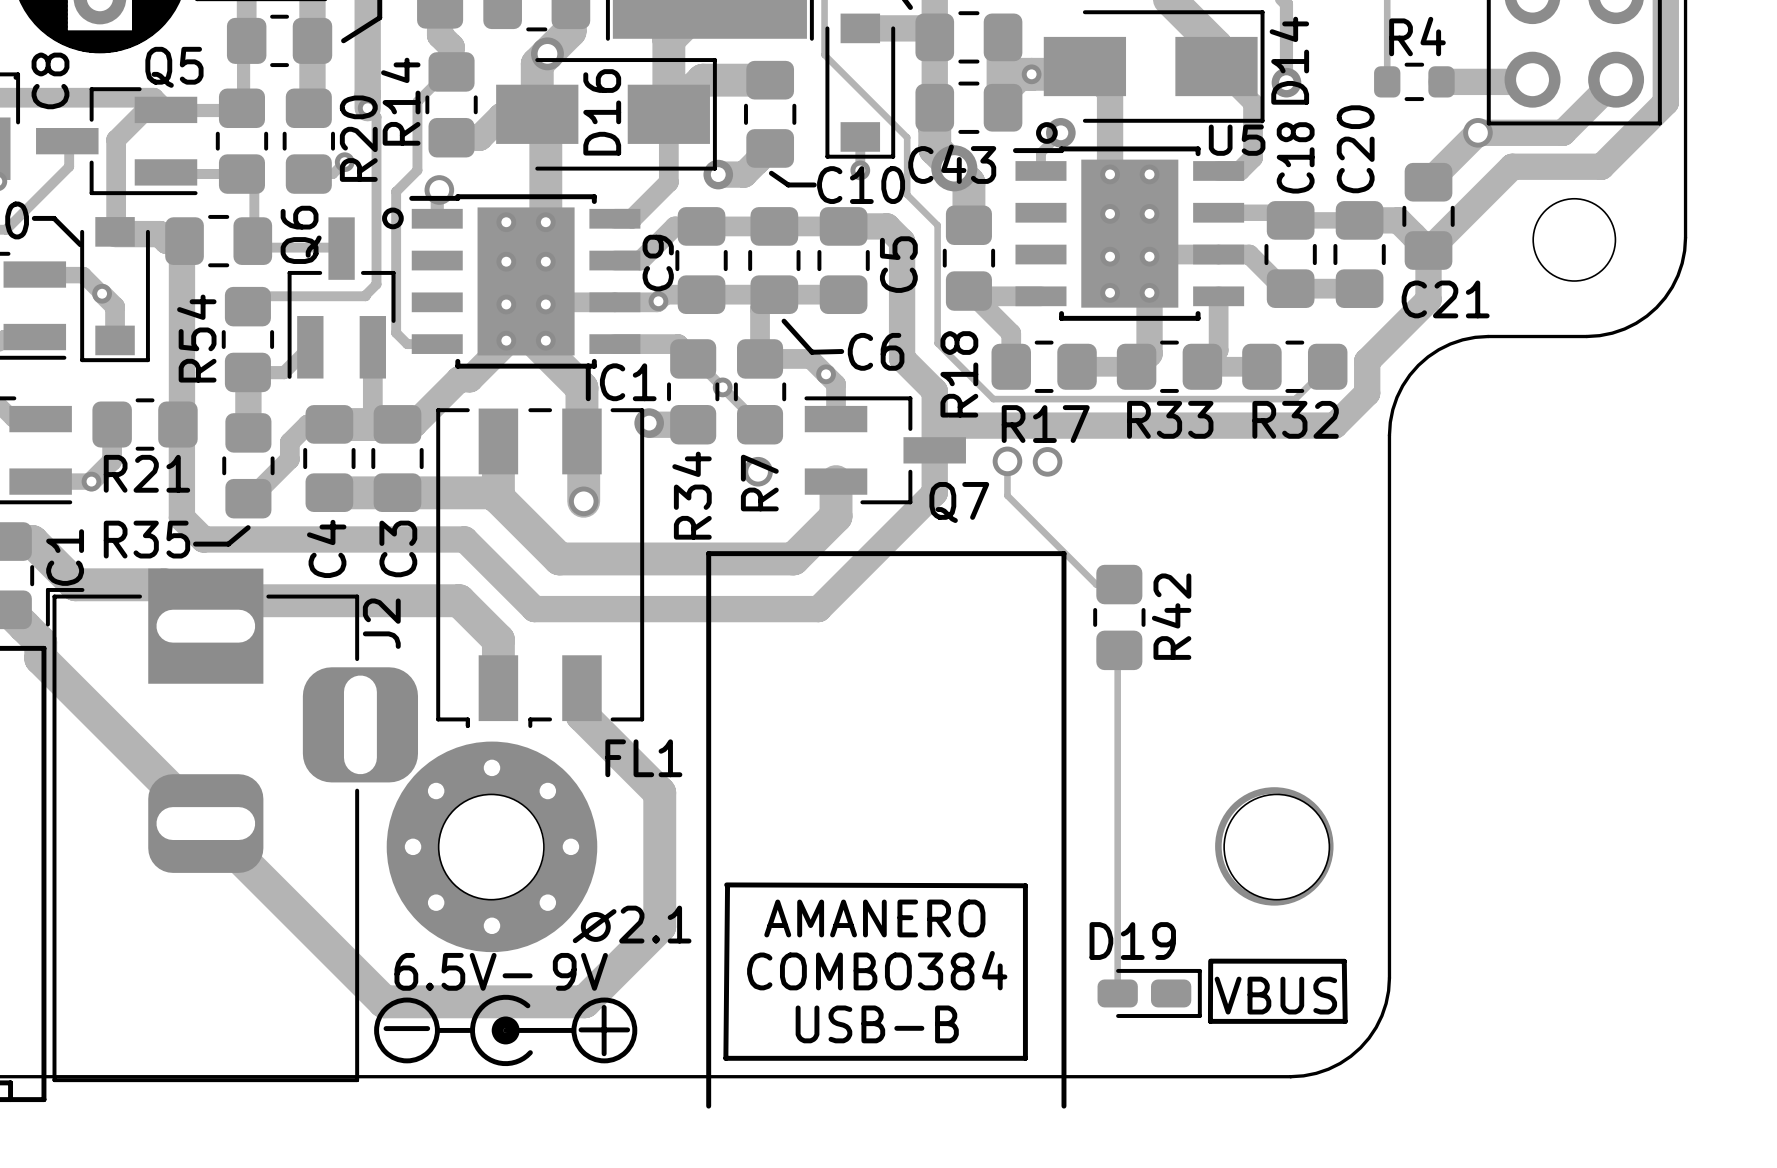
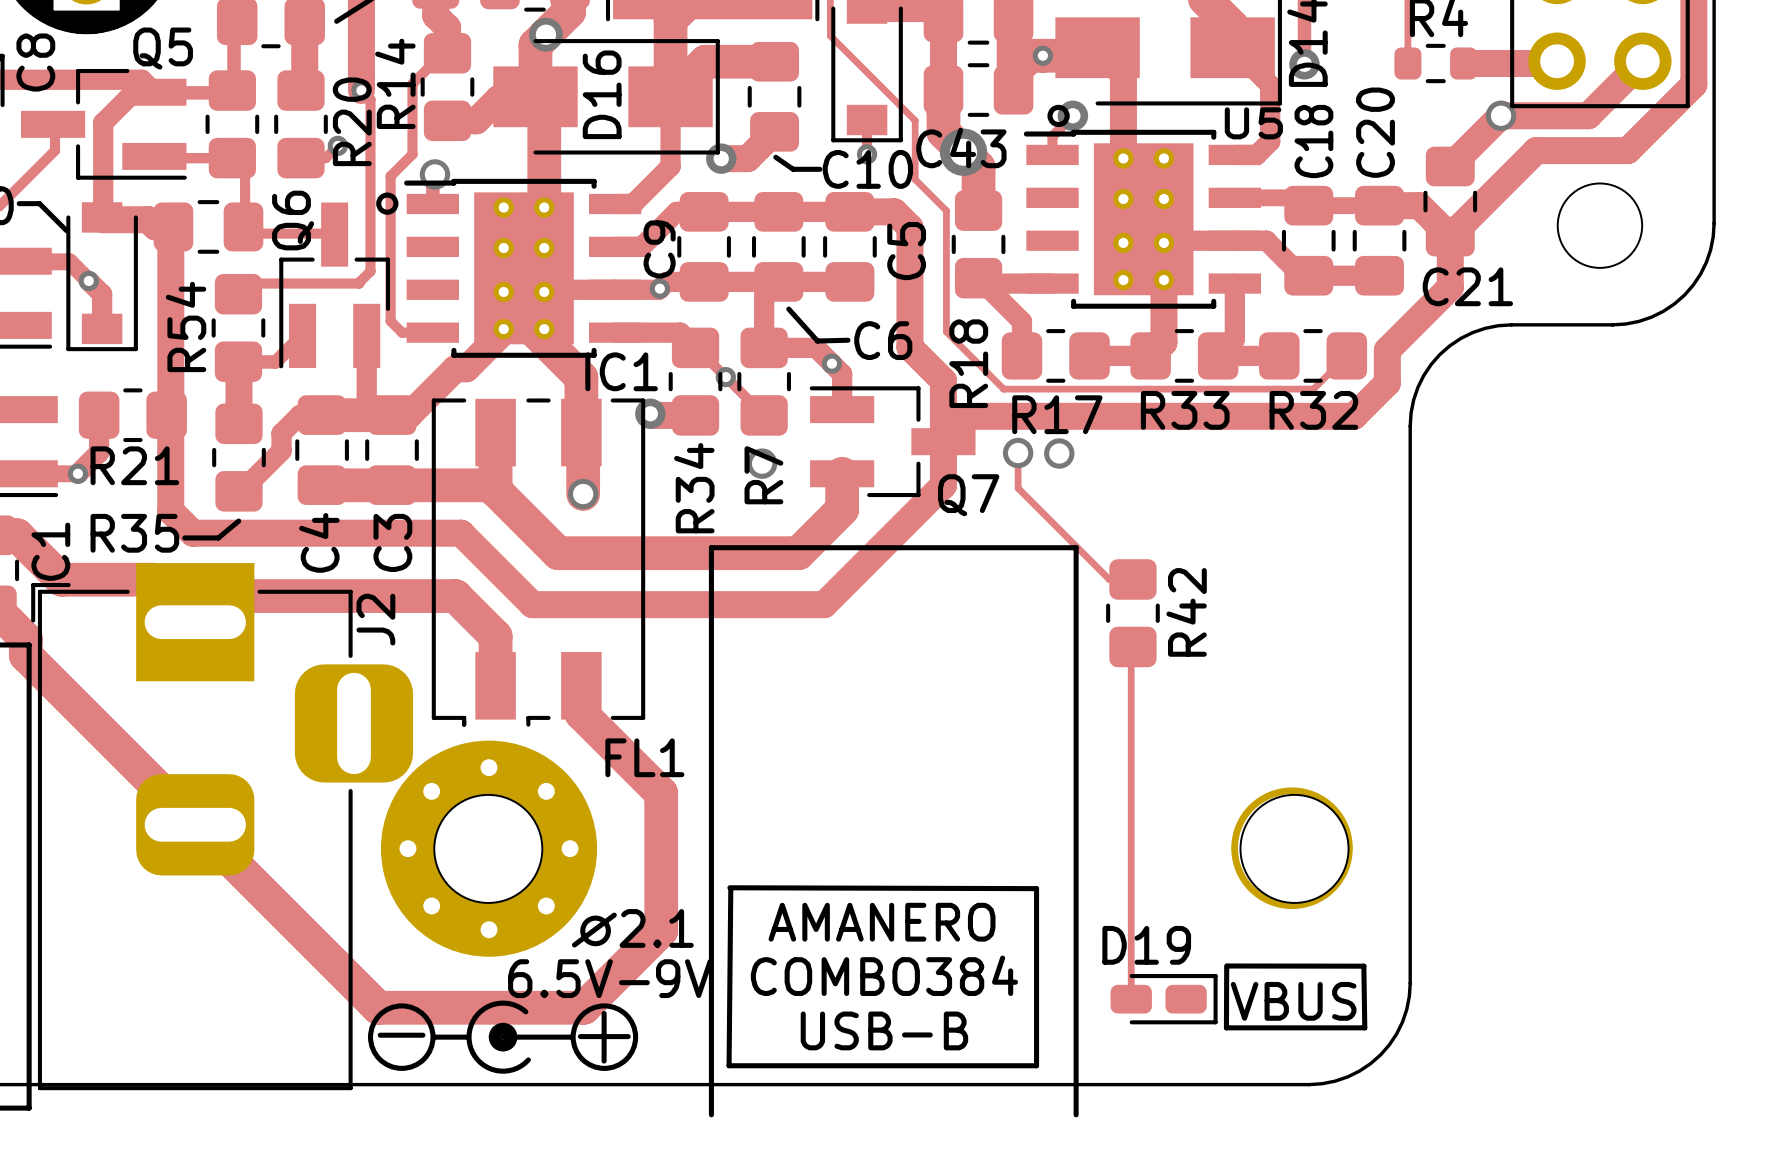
text: 6.5V- (463, 971) -> none
text: 9V (580, 971) -> 6.5V- (578, 978)
text: none -> 9V (684, 978)

